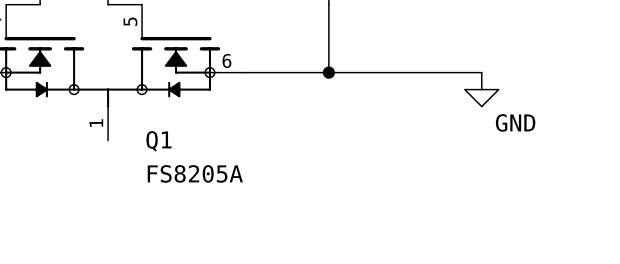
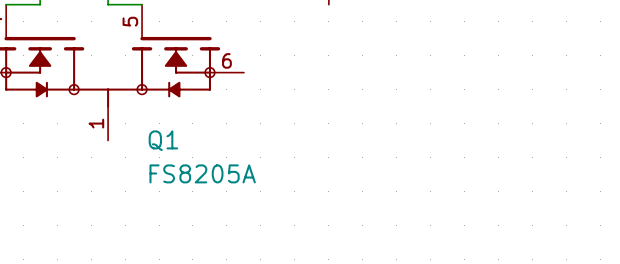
wire: (328, 4) (328, 72) -> none
wire: (243, 72) (481, 72) -> none
junction: (328, 72) -> none
power symbol: GND (481, 89) -> none

